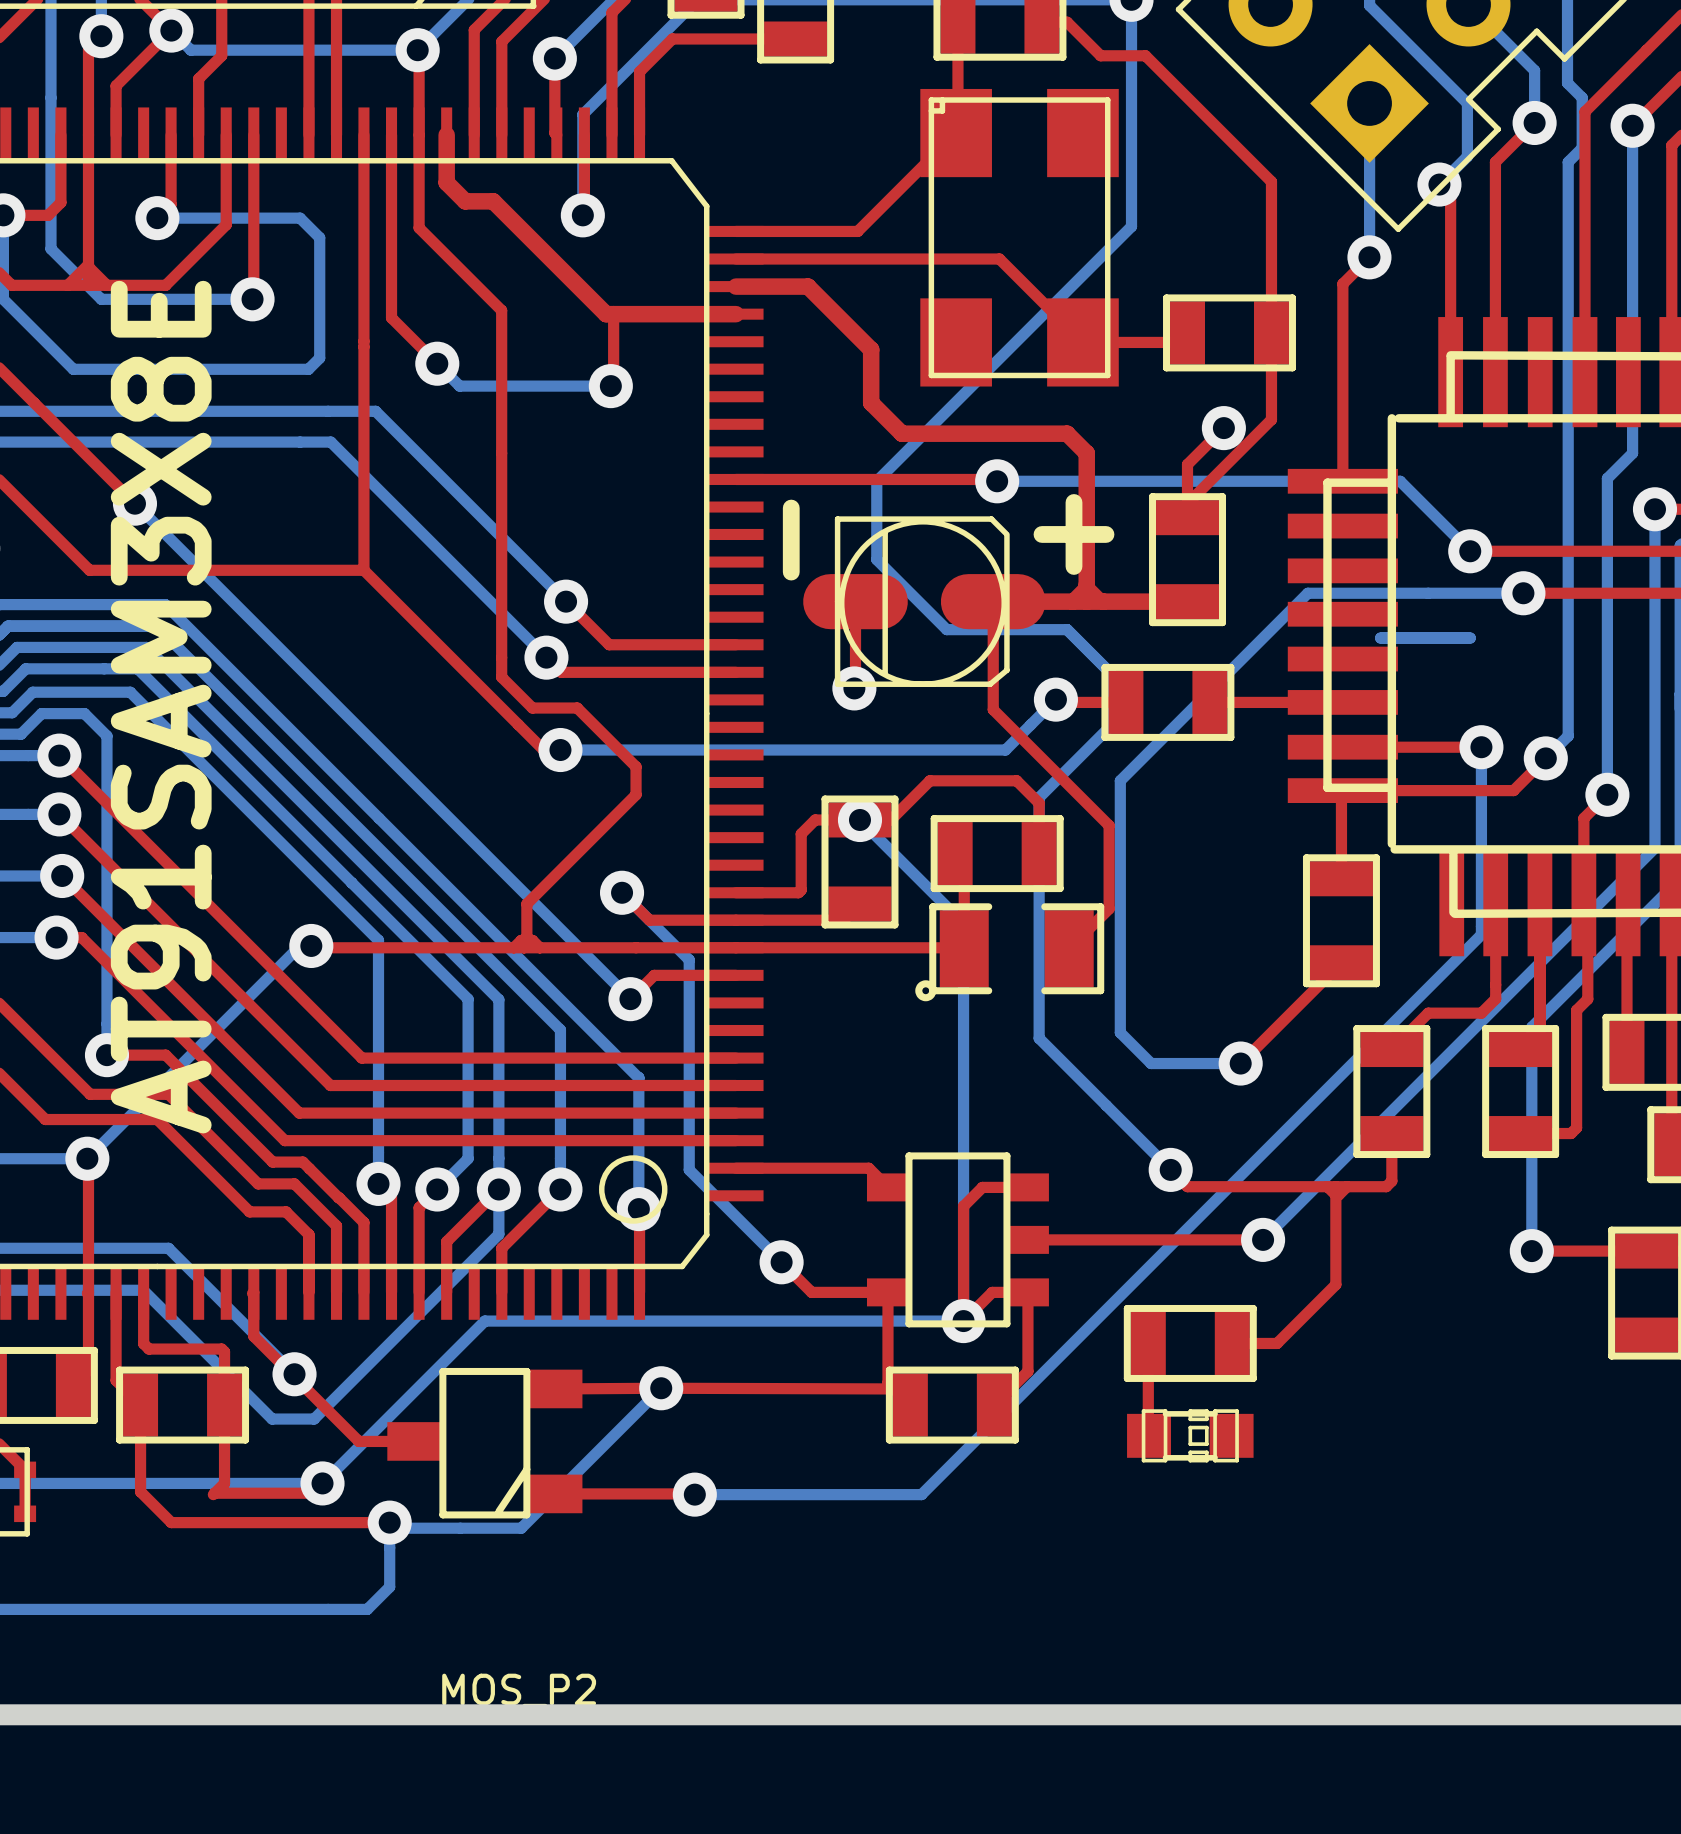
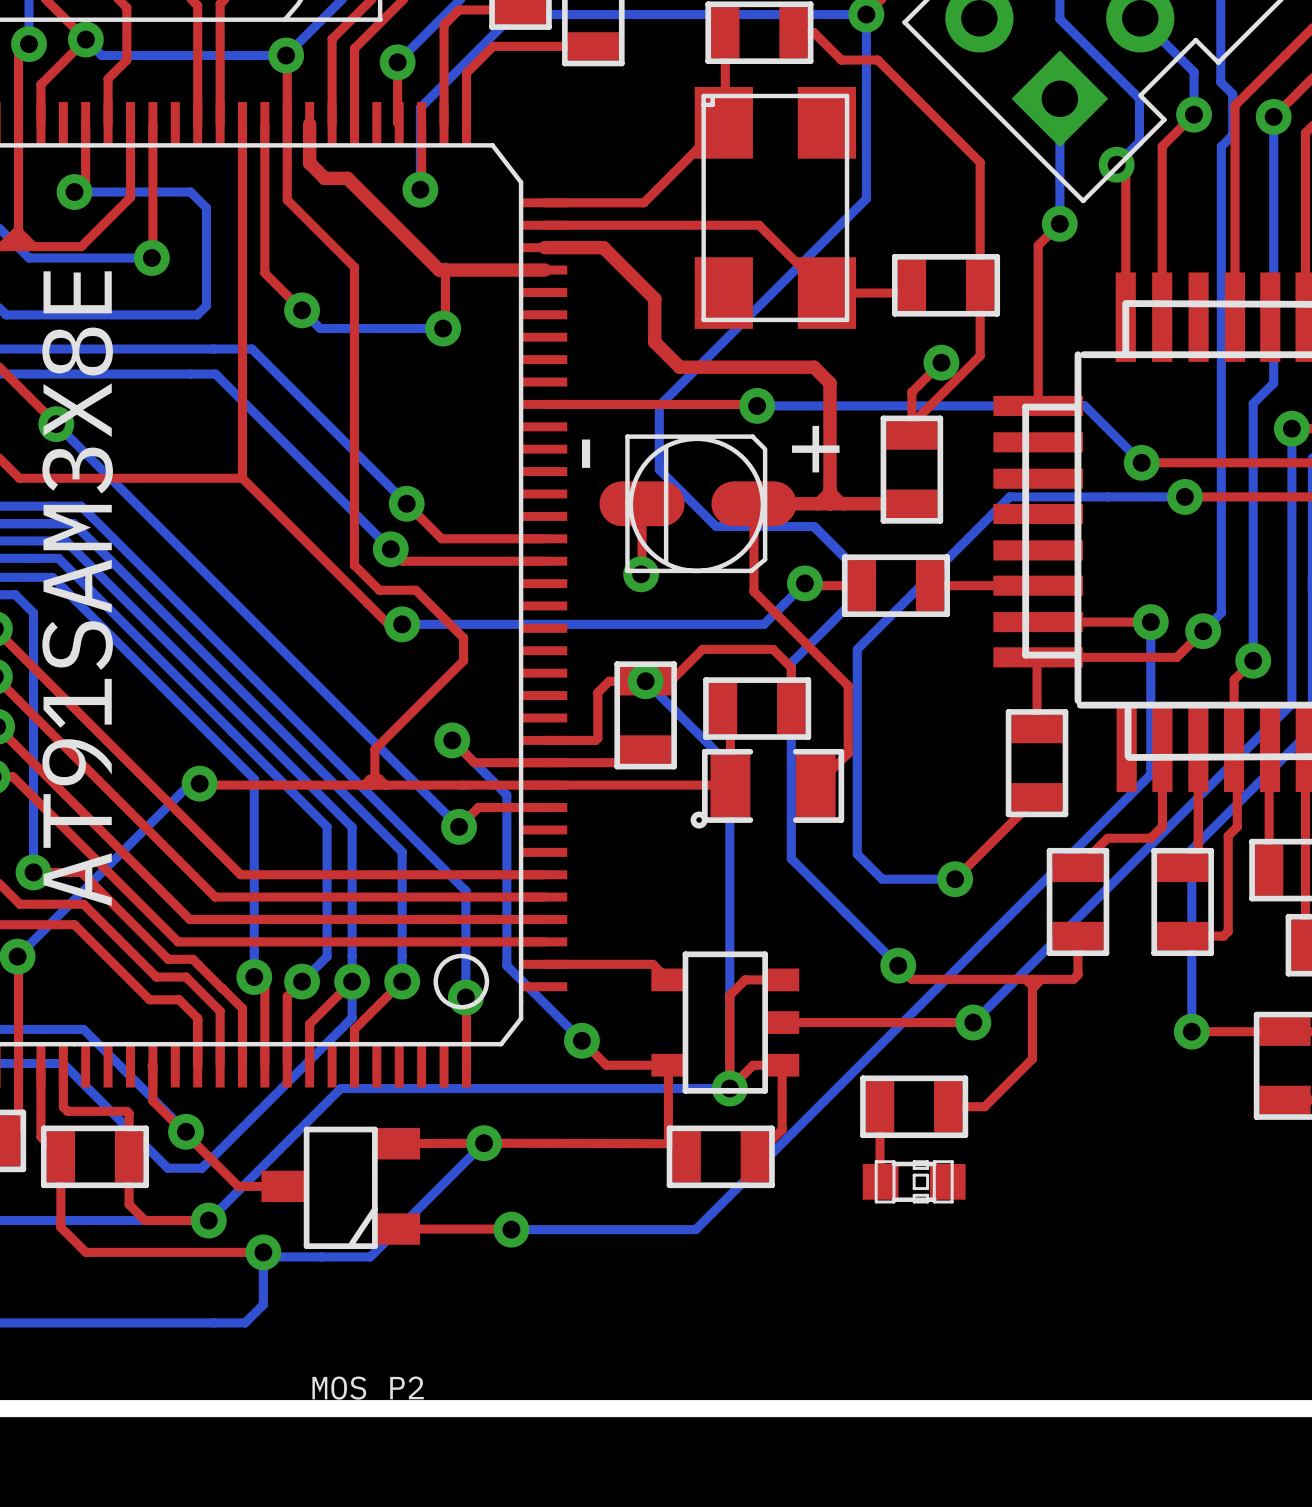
bottom track: (1380, 638) (1470, 638) -> none
top track: (224, 1463) (224, 1483) (213, 1494) -> (129, 1204) (145, 1220) (208, 1220)
top track: (214, 1493) (312, 1493) -> none

